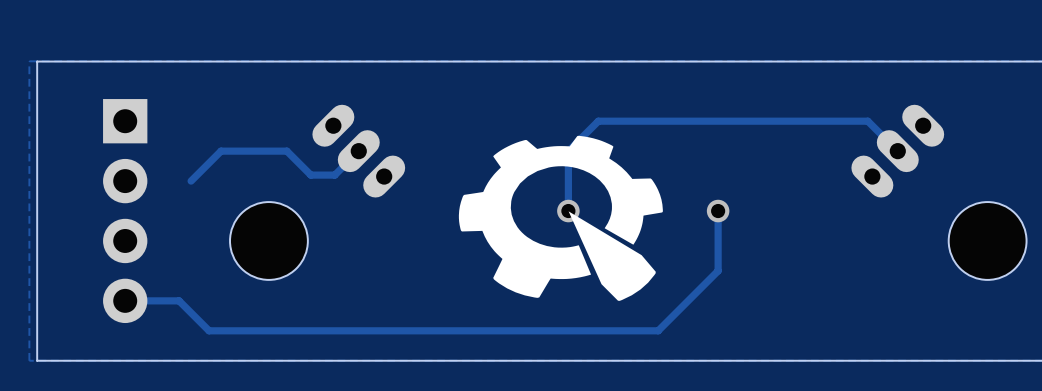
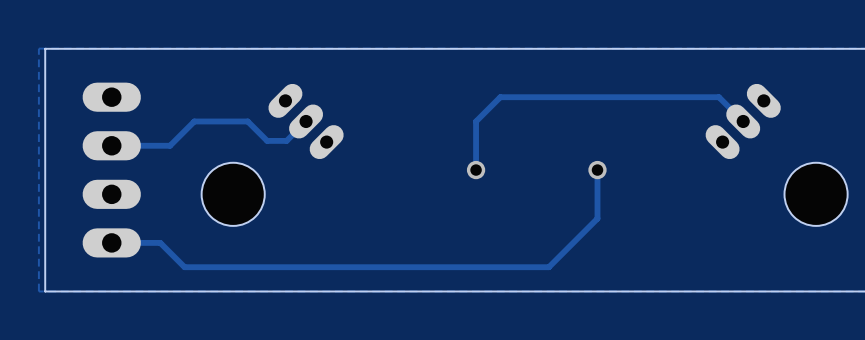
part footprint: [103, 99, 148, 324] -> [82, 82, 141, 258]
drawing: [458, 135, 663, 301] -> none
track: none -> (170, 145) (111, 145)

